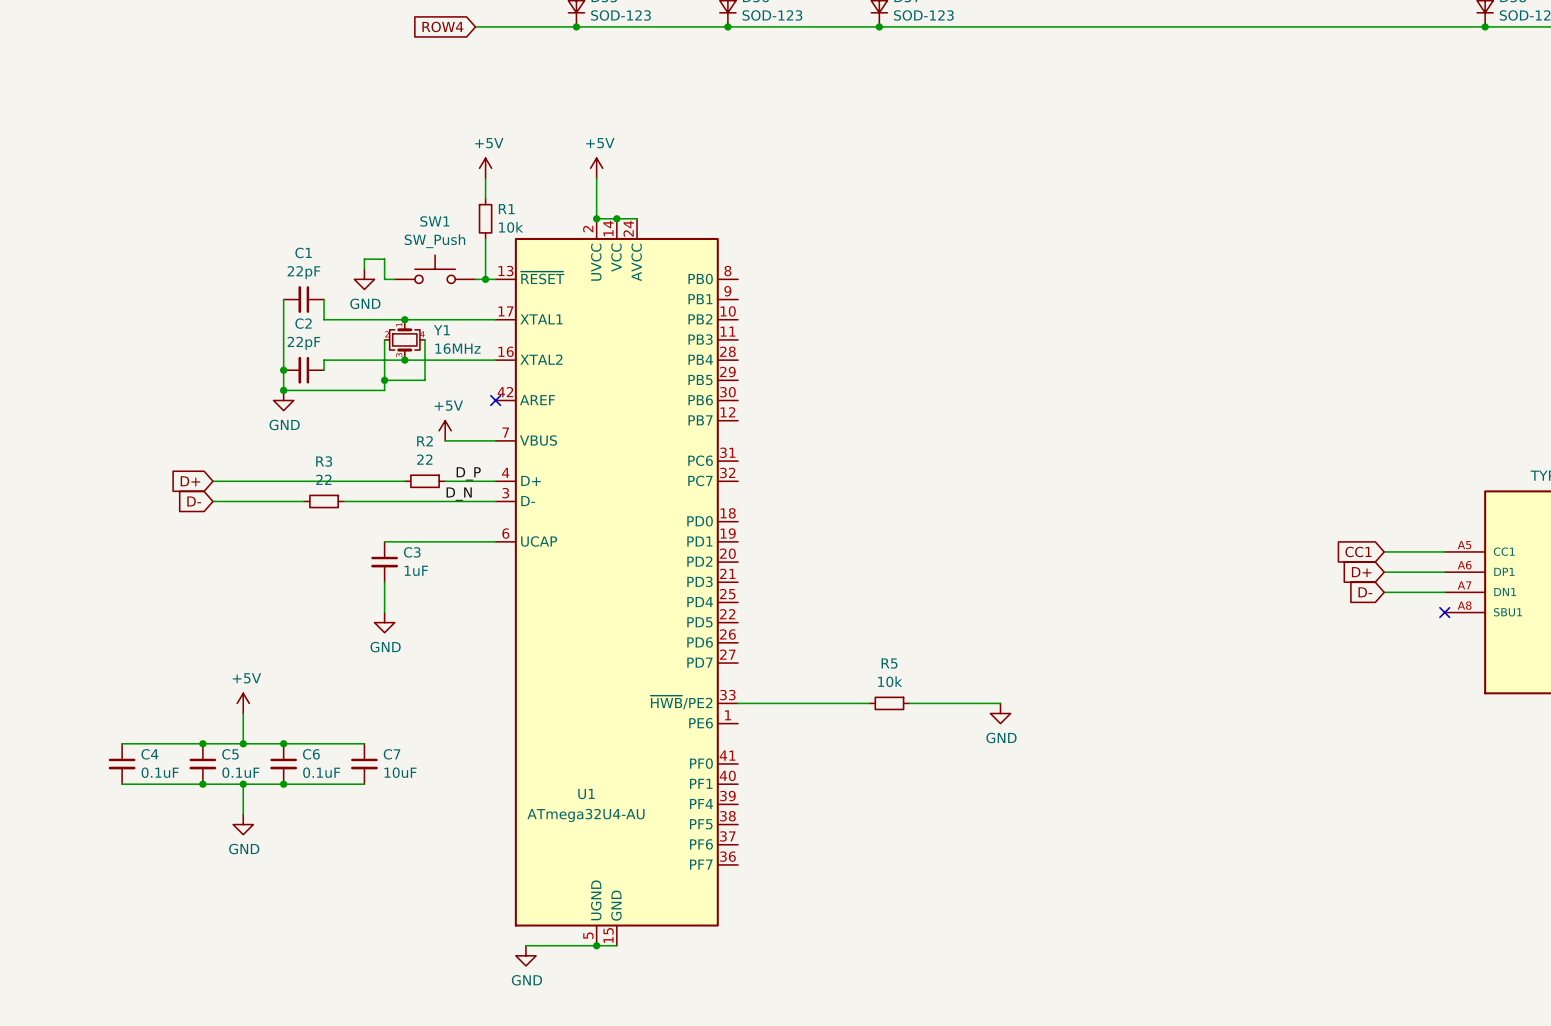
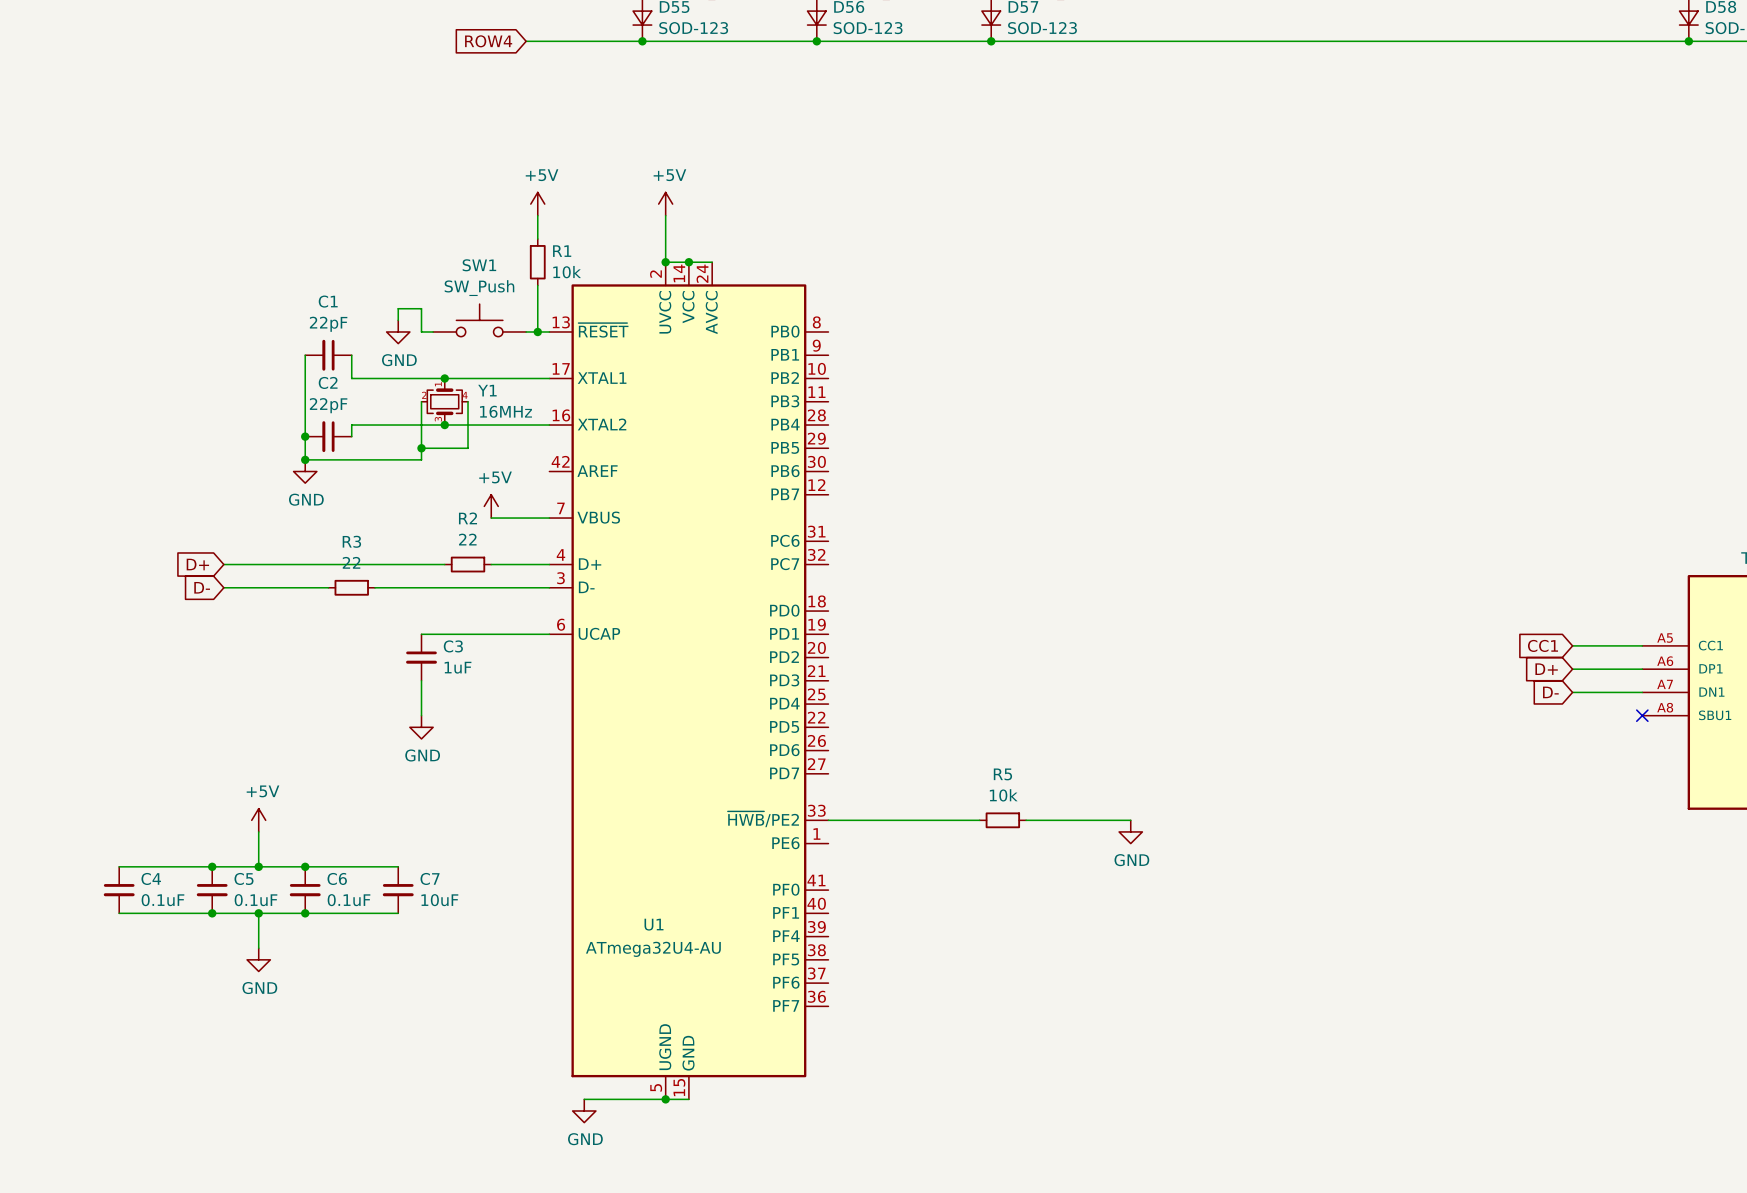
no-connect mark: (495, 400) -> none
label: D_P (468, 473) -> none
label: D_N (459, 494) -> none

